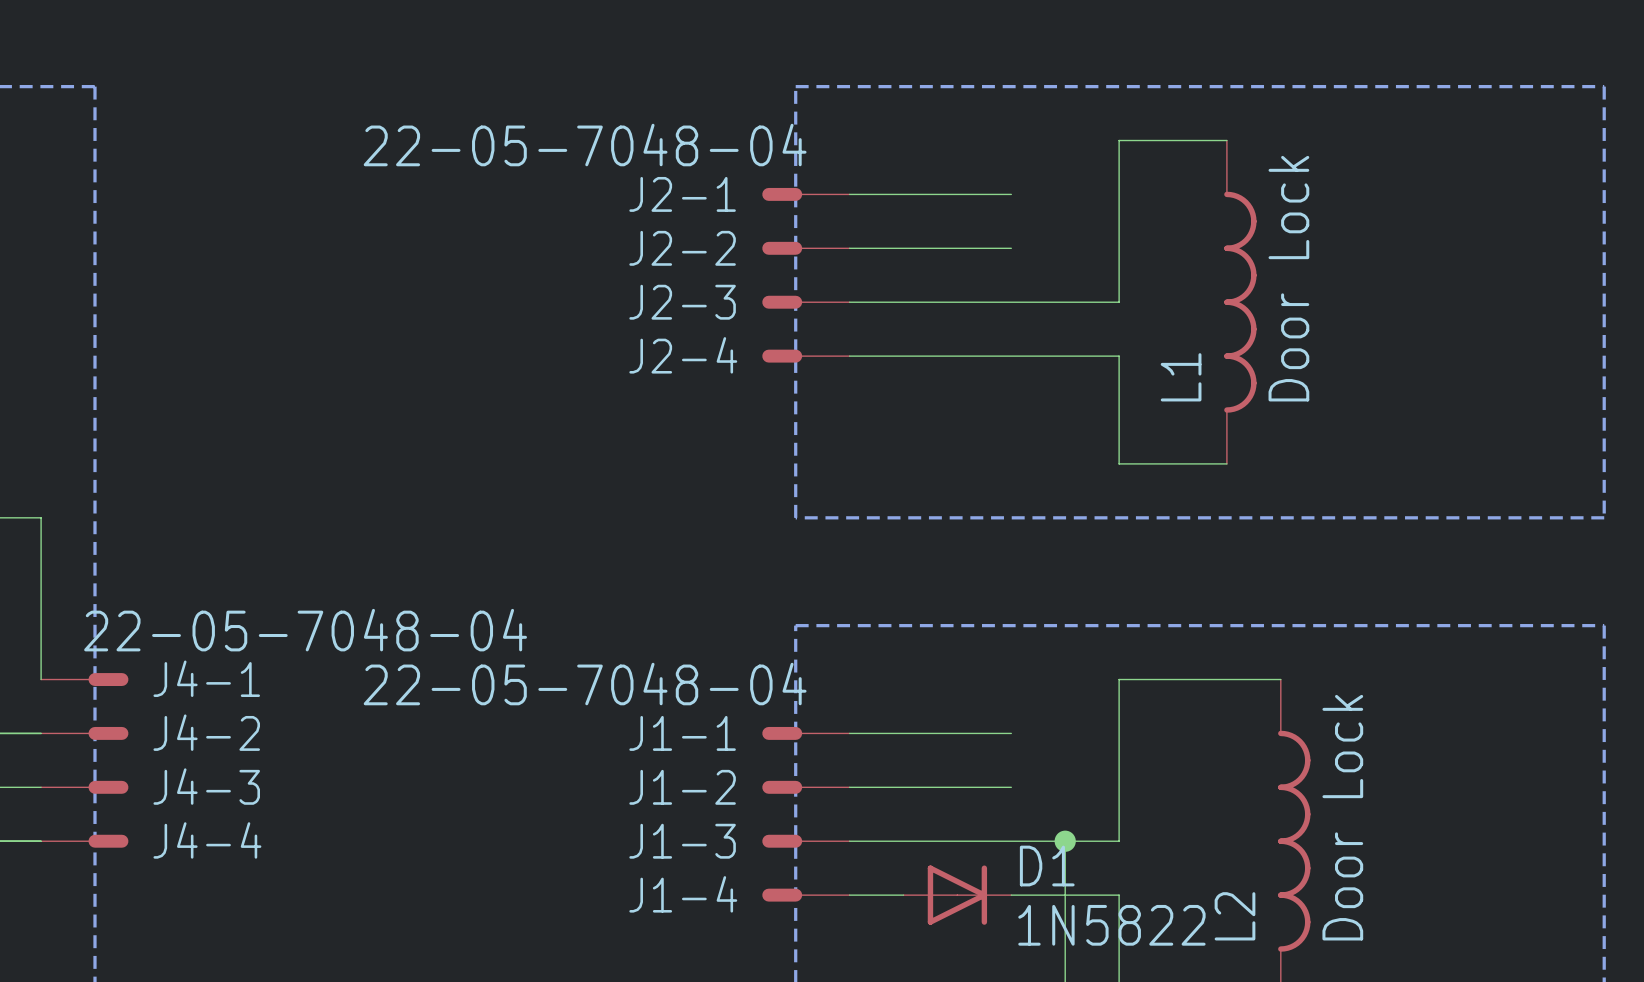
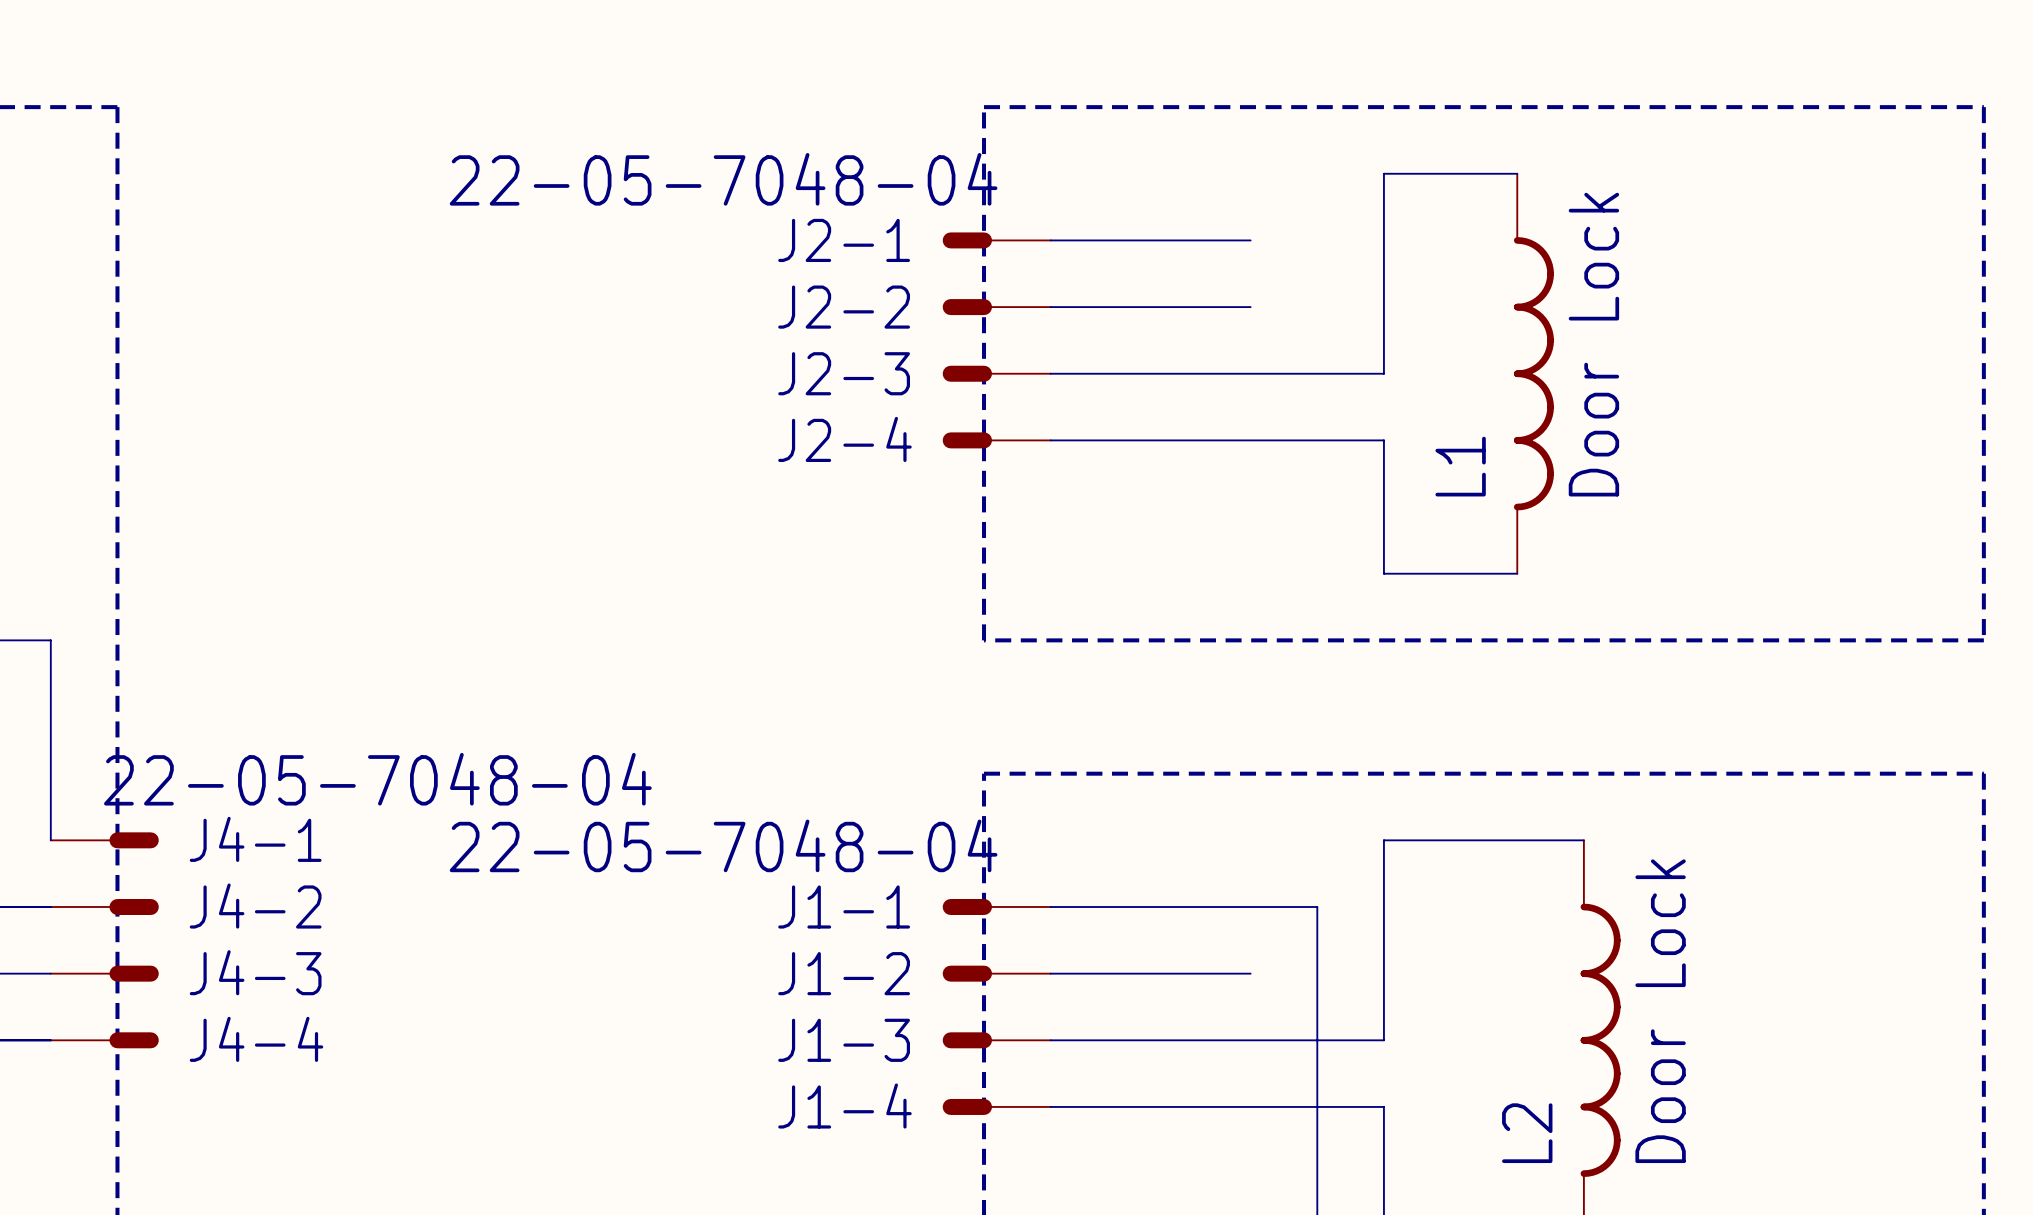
wire: none -> (1250, 907) (1317, 907) (1317, 1040)
junction: (1065, 841) -> none
D1: 1N5822 (957, 895) -> none

